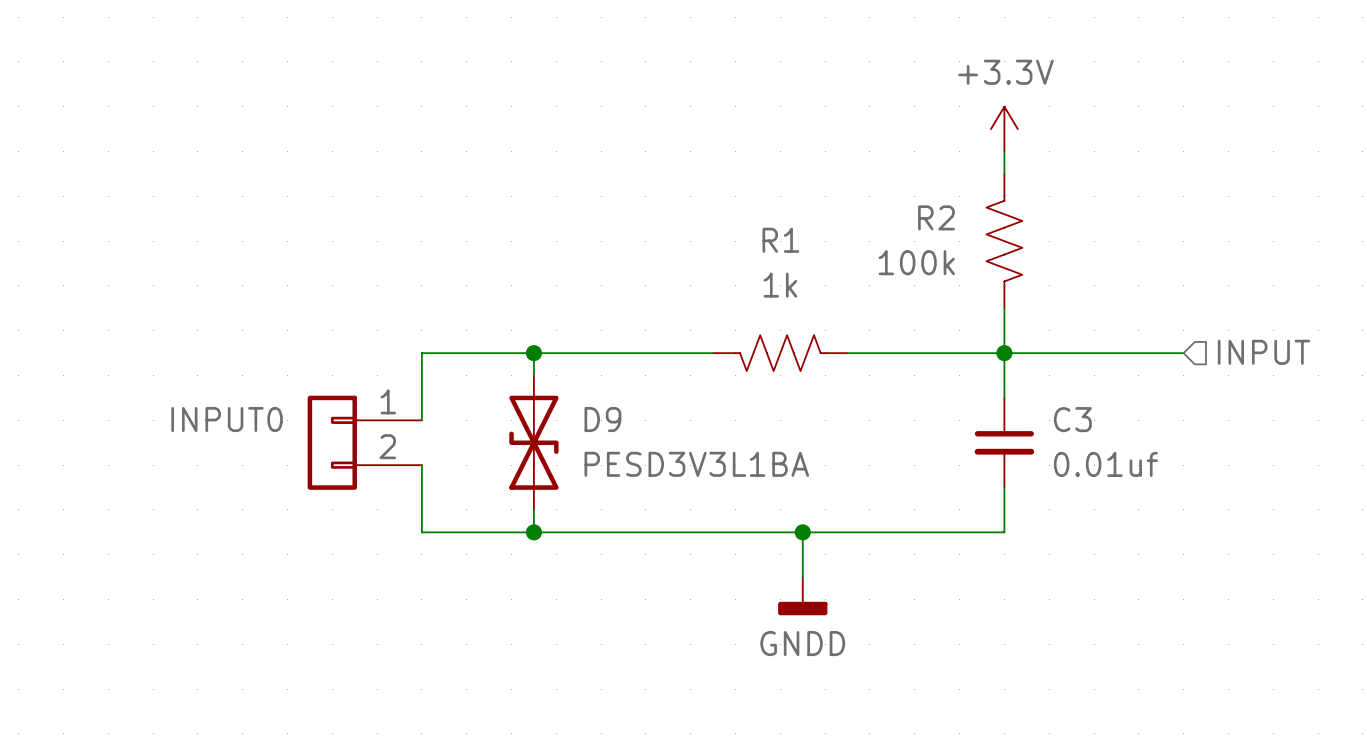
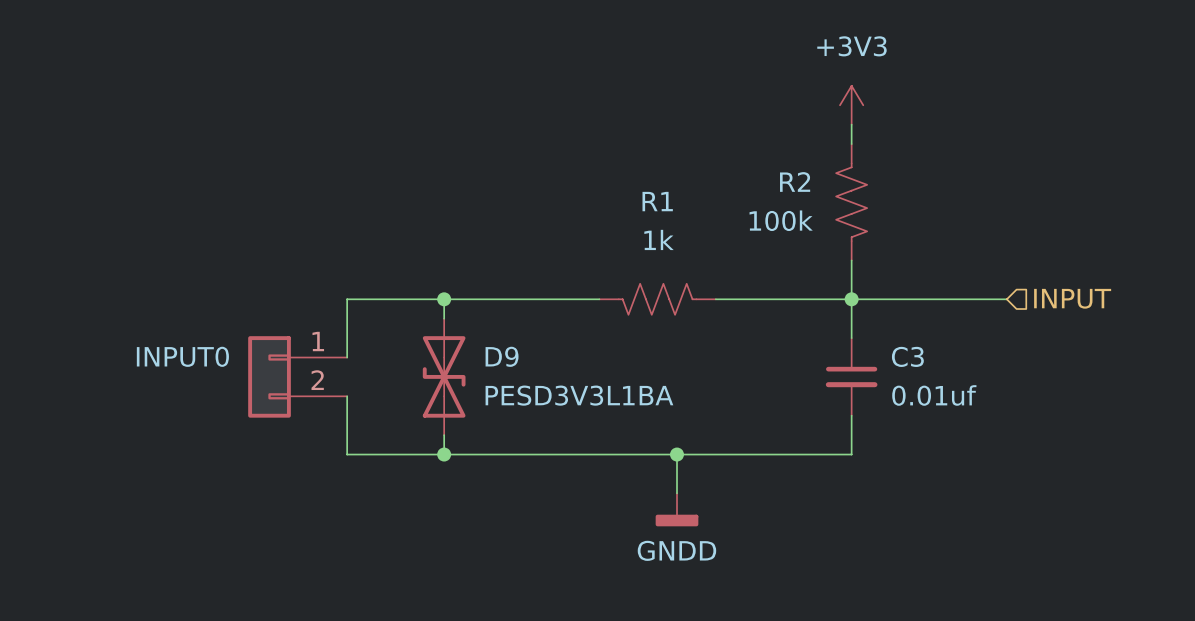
power symbol: +3.3V (1004, 129) -> +3V3 (851, 105)

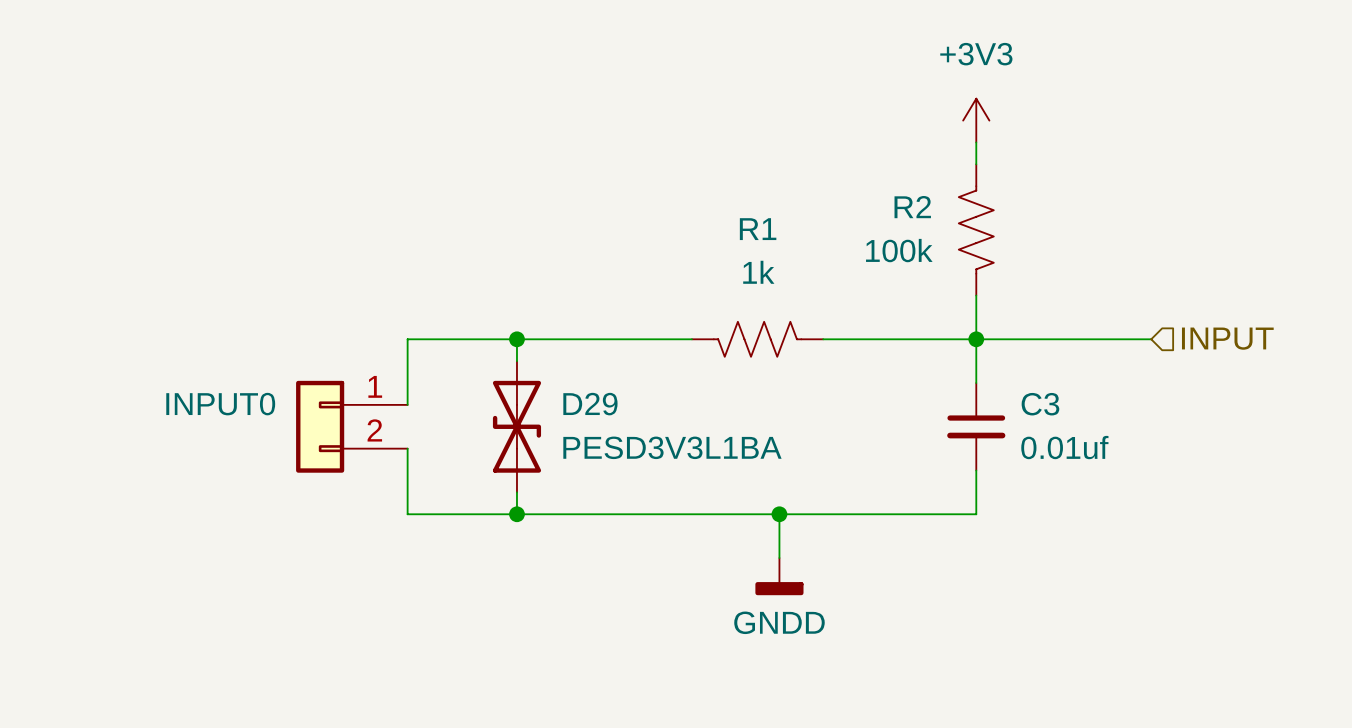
D9 name: D9 (502, 356) -> D29 (590, 404)

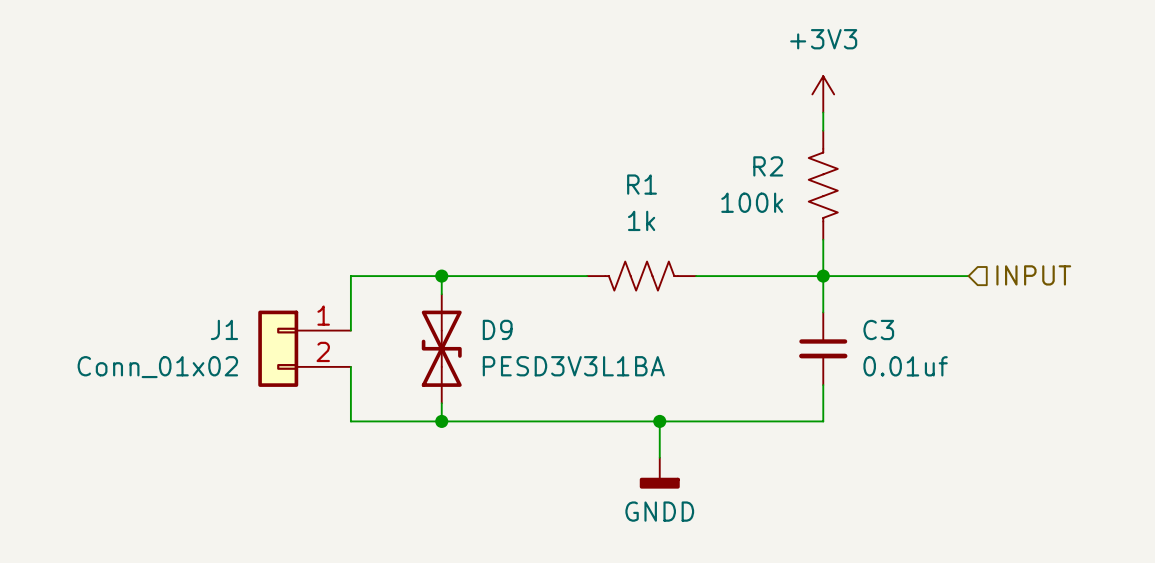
INPUT0 name: INPUT0 (220, 404) -> J1 (224, 329)
D29 name: D29 (590, 404) -> D9 (497, 329)
INPUT0 value: none -> Conn_01x02 (157, 367)

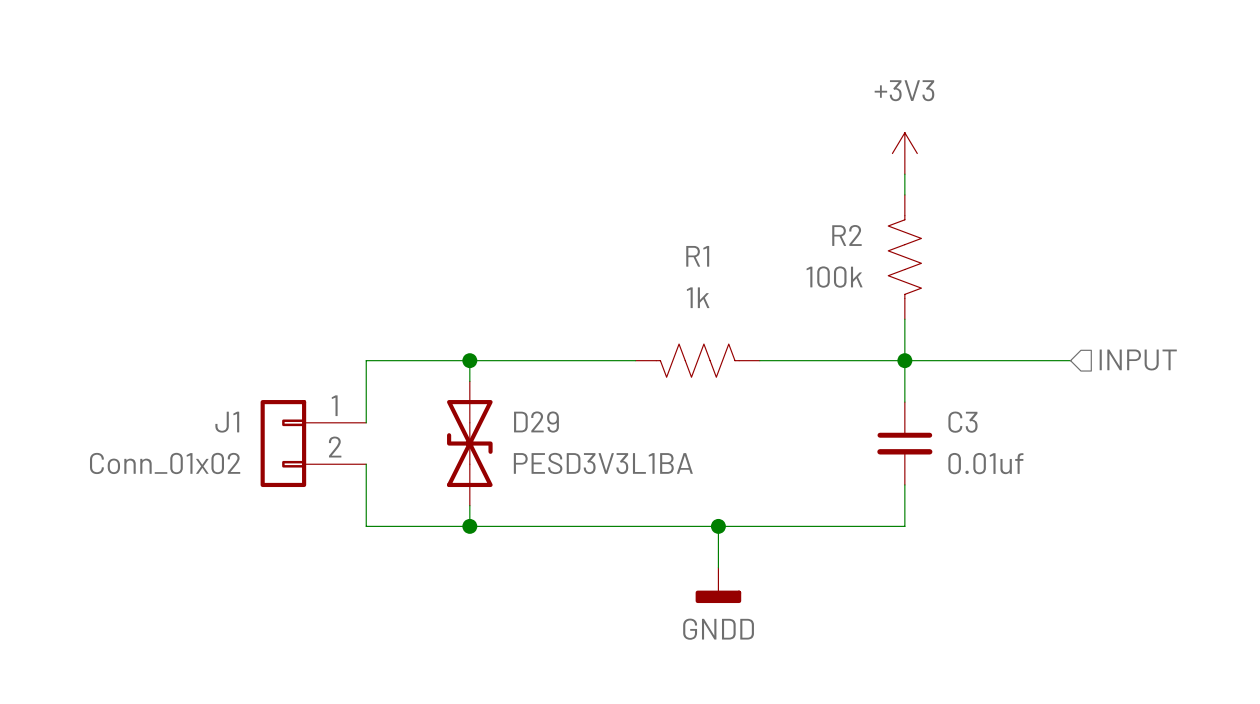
D9 name: D9 (497, 329) -> D29 (536, 422)

